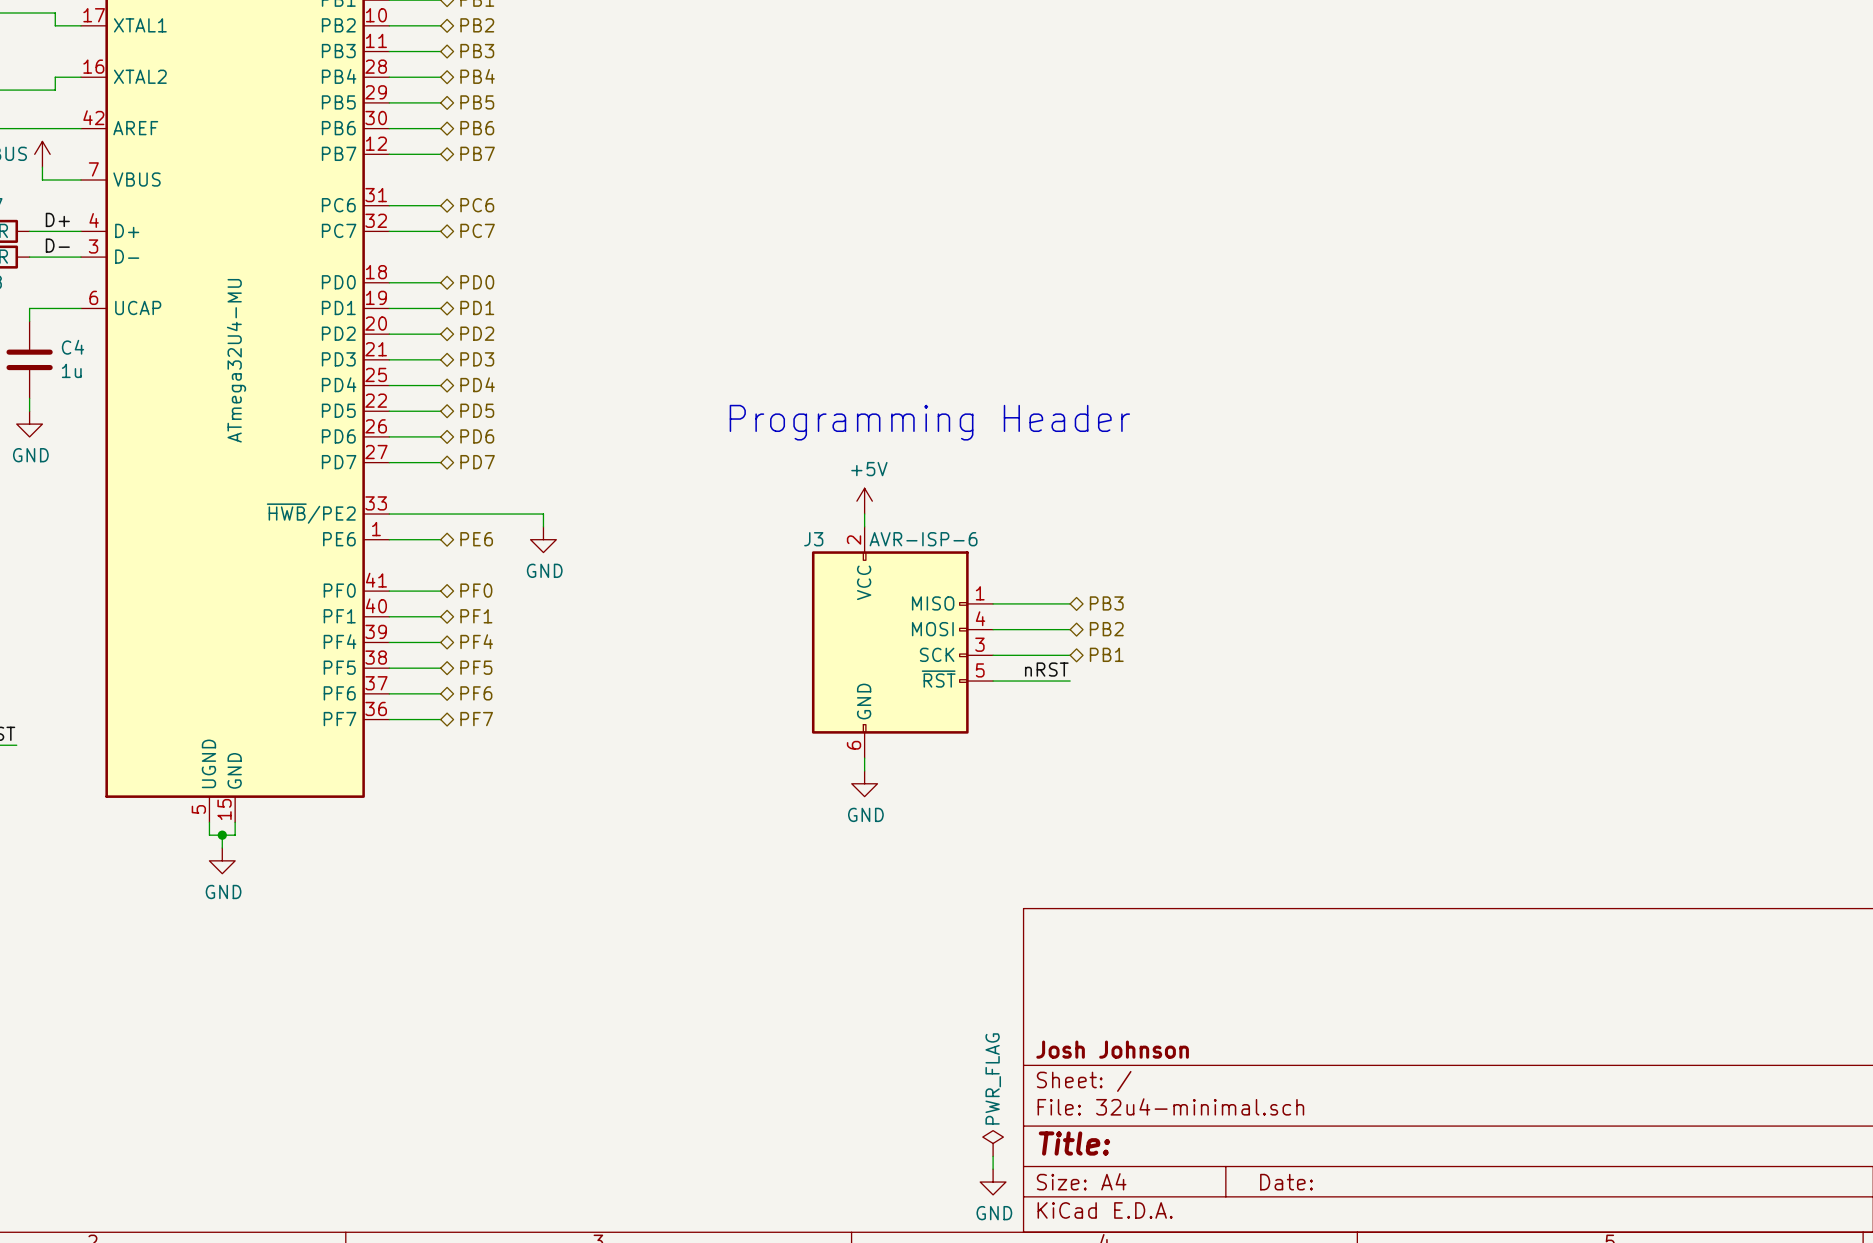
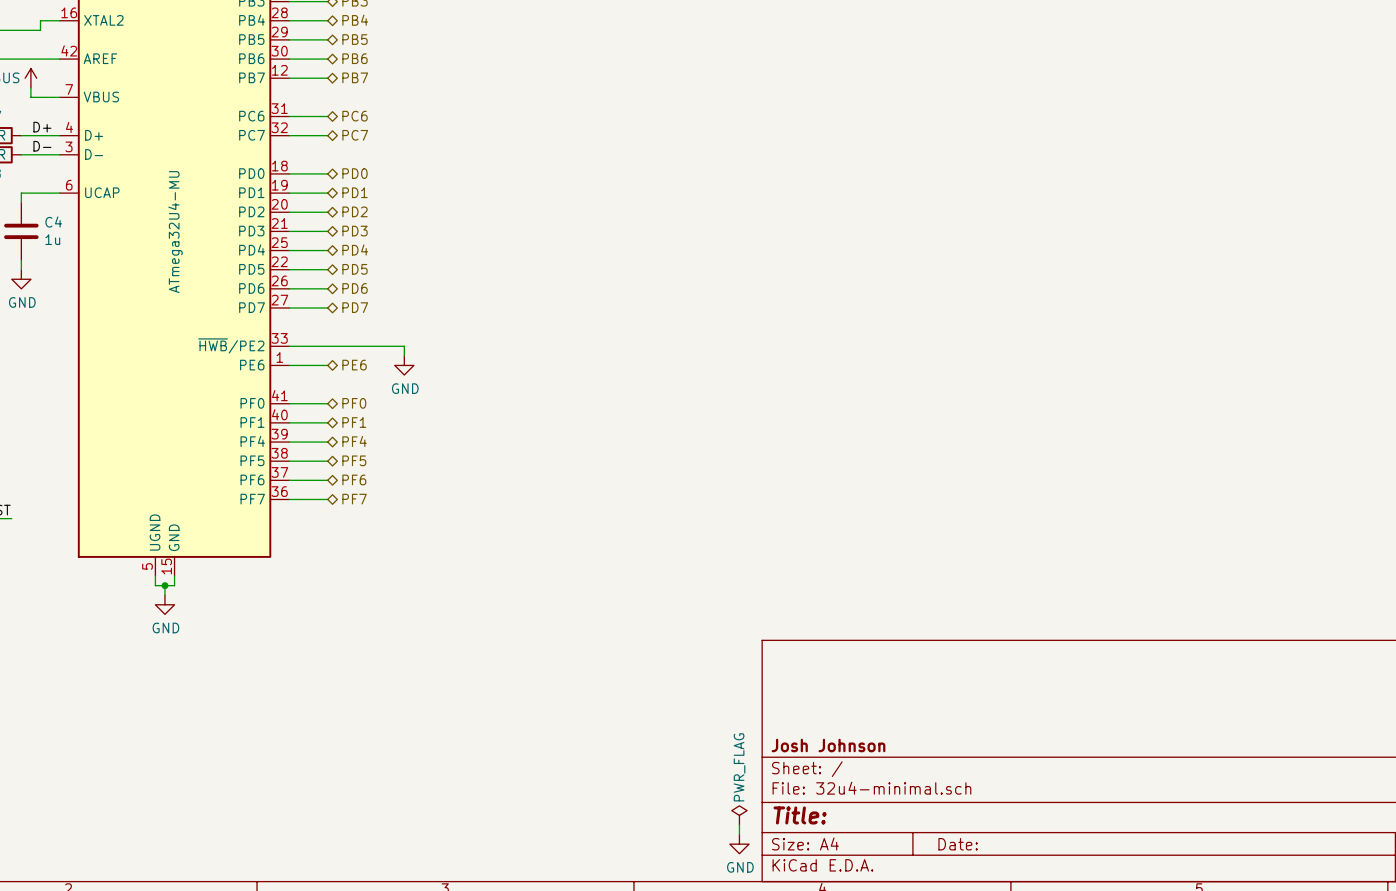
text: Programming Header (929, 422) -> none
power symbol: +5V (864, 501) -> none
wire: (864, 514) (864, 526) -> none
wire: (993, 603) (1070, 603) -> none
hierarchical label: PB3 (1106, 603) -> none
wire: (993, 629) (1070, 629) -> none
hierarchical label: PB2 (1106, 629) -> none
J3: AVR-ISP-6 (902, 642) -> none
hierarchical label: PB1 (1106, 654) -> none
wire: (993, 655) (1070, 655) -> none
label: nRST (1046, 669) -> none
wire: (993, 681) (1070, 681) -> none
wire: (864, 758) (864, 770) -> none
power symbol: GND (864, 783) -> none

